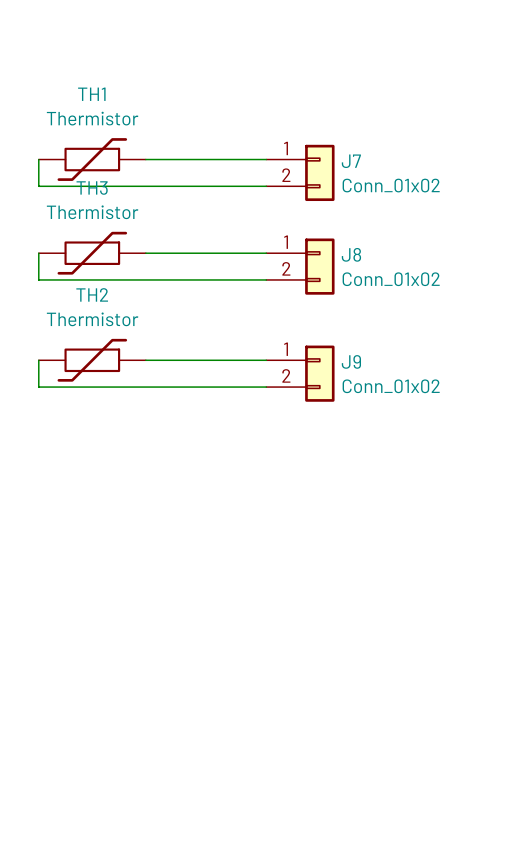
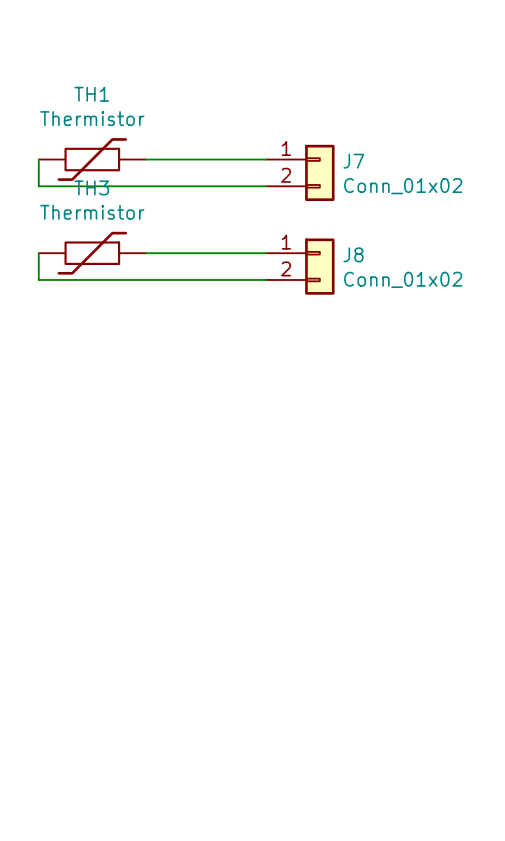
wire: (38, 360) (38, 387) (266, 387) -> none
TH2: Thermistor (92, 360) -> none
wire: (145, 360) (266, 360) -> none
J9: Conn_01x02 (300, 373) -> none

